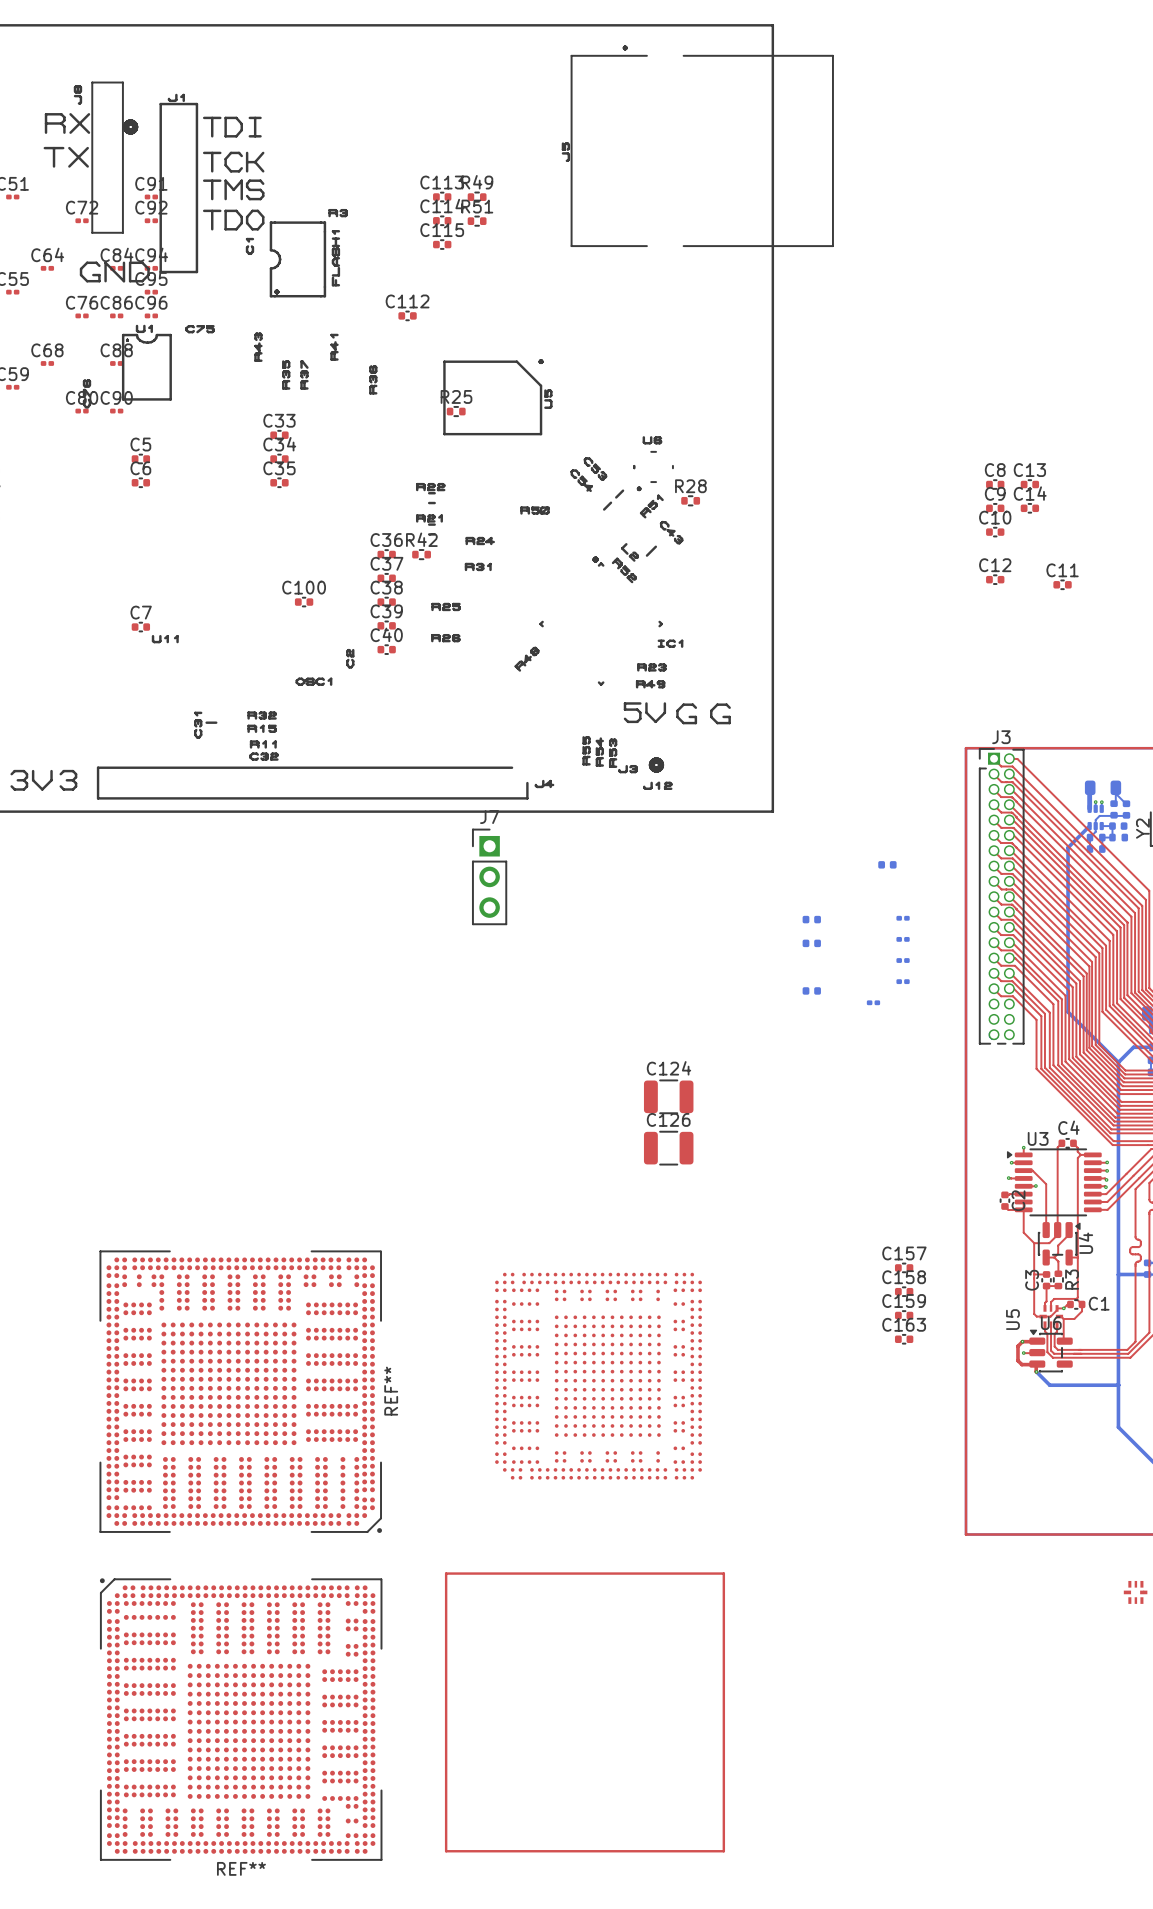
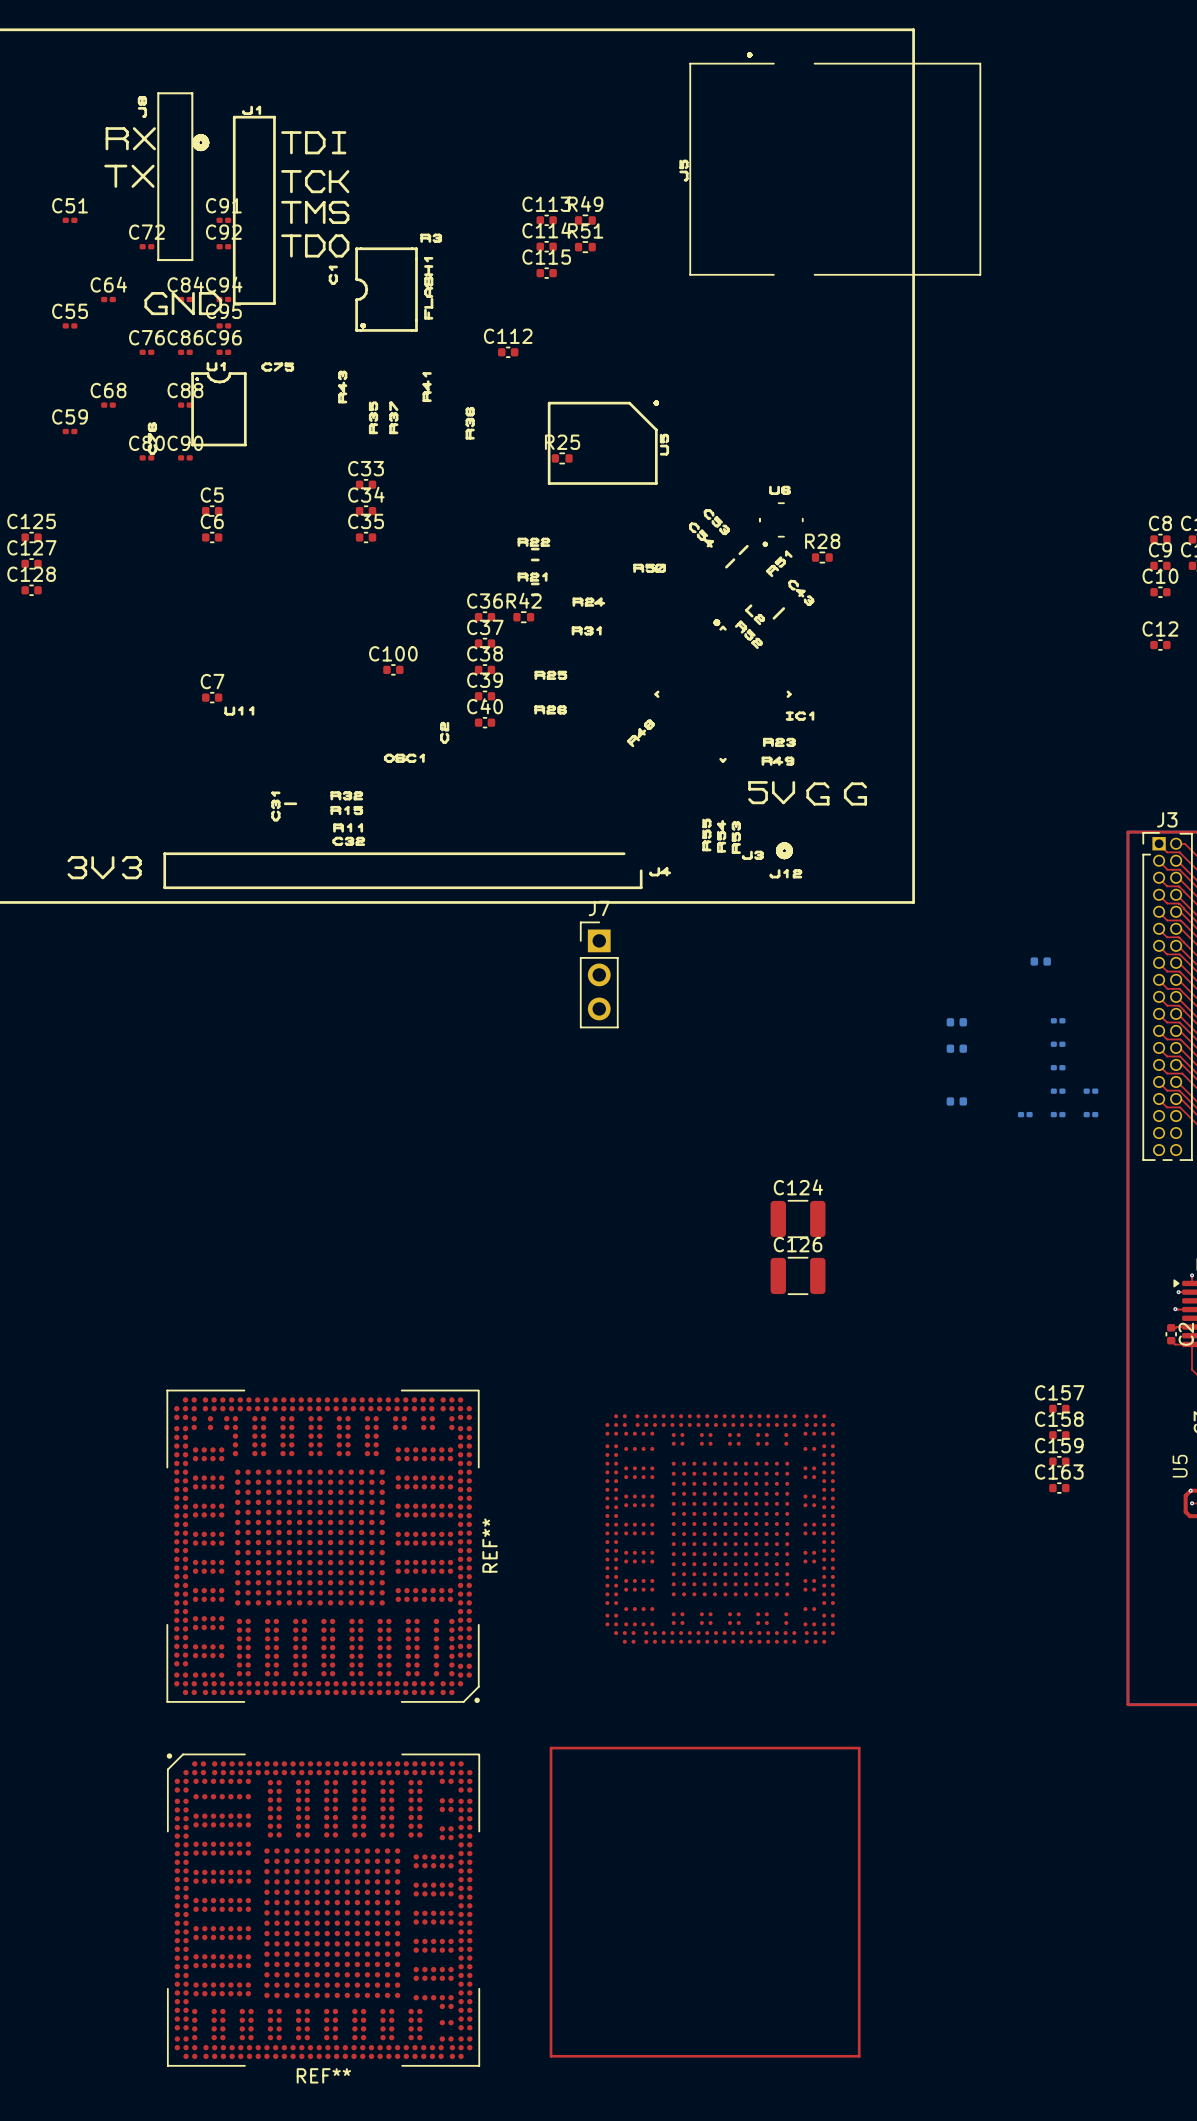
part: none -> (1090, 1091)
part: none -> (1058, 1114)
part: none -> (1090, 1114)

